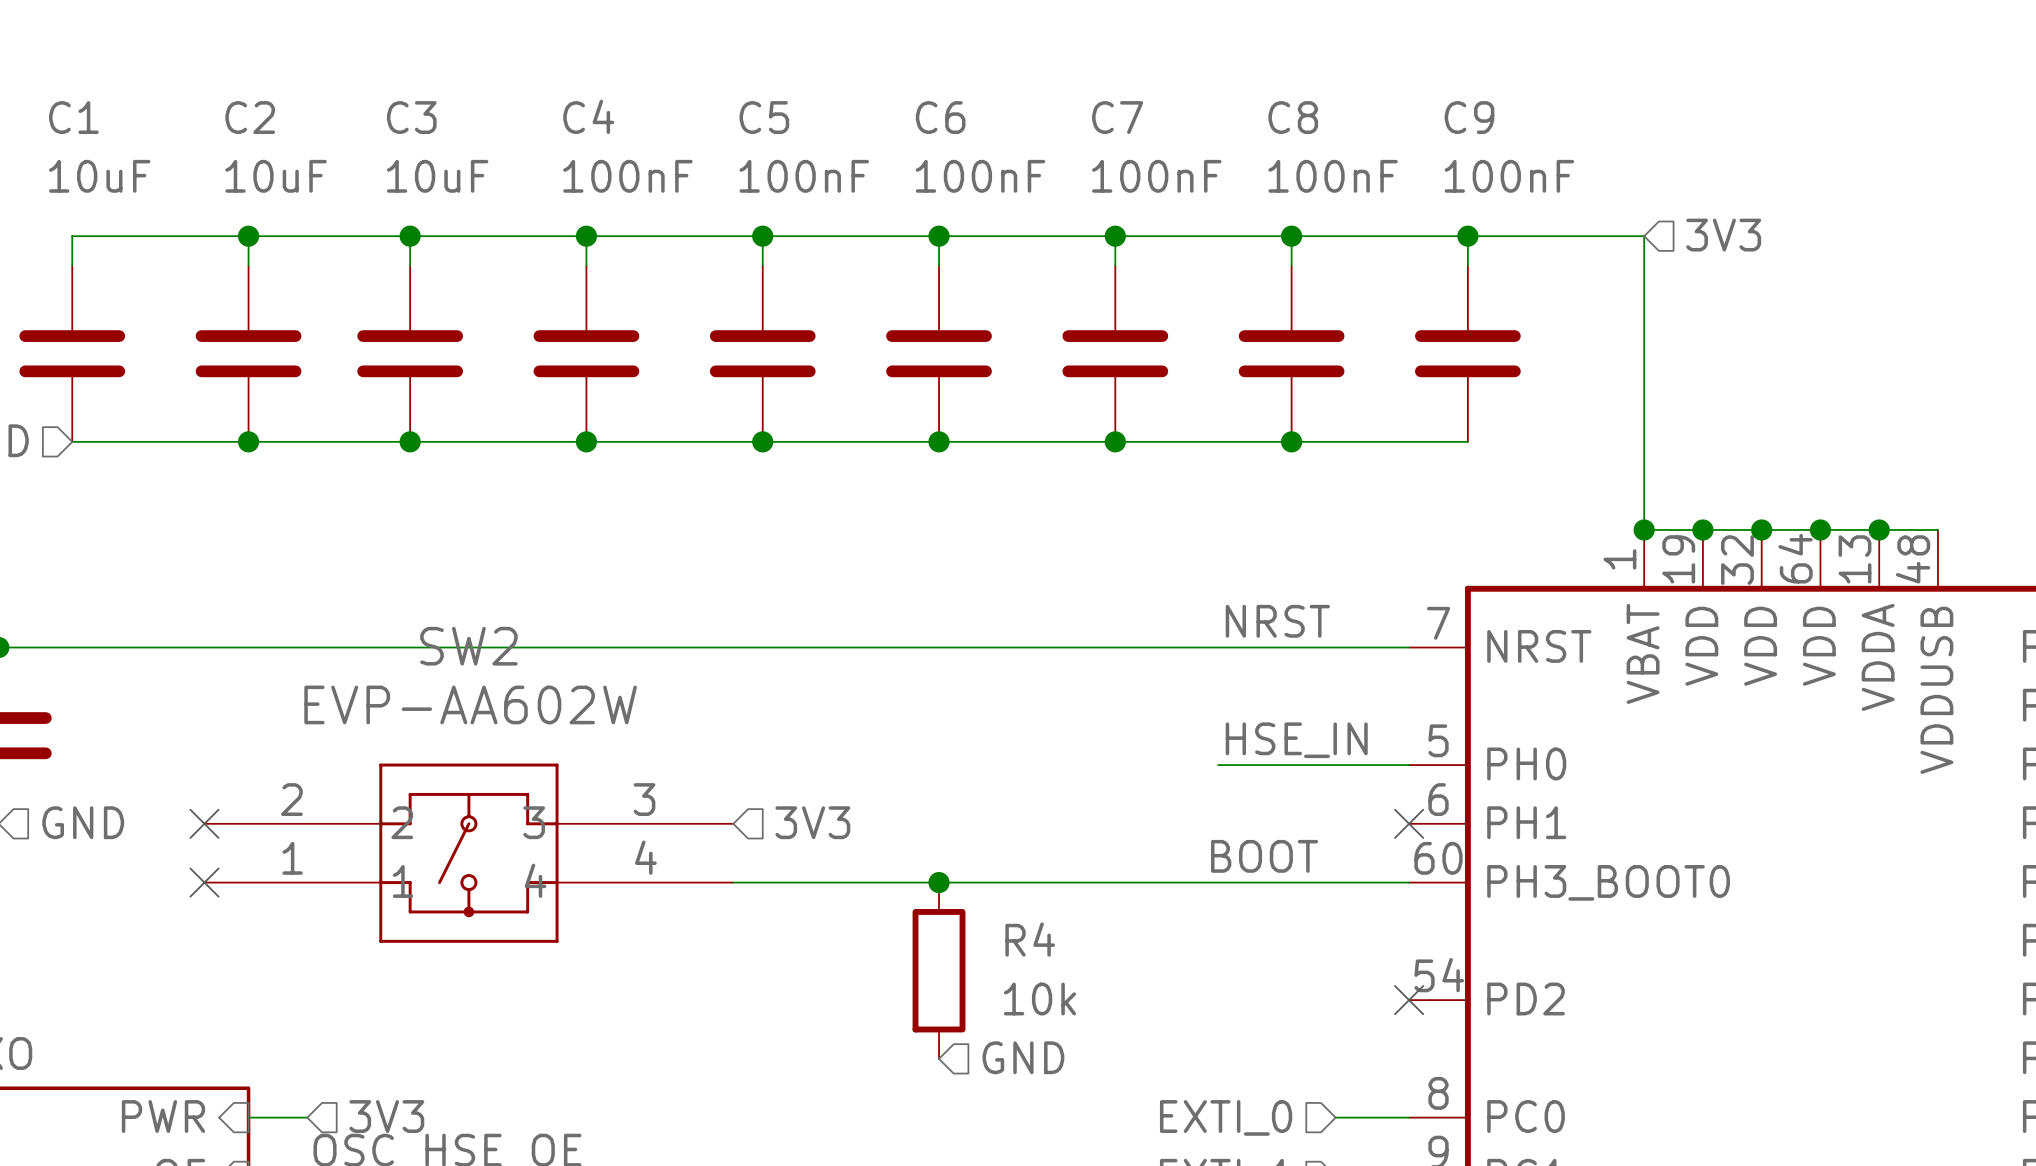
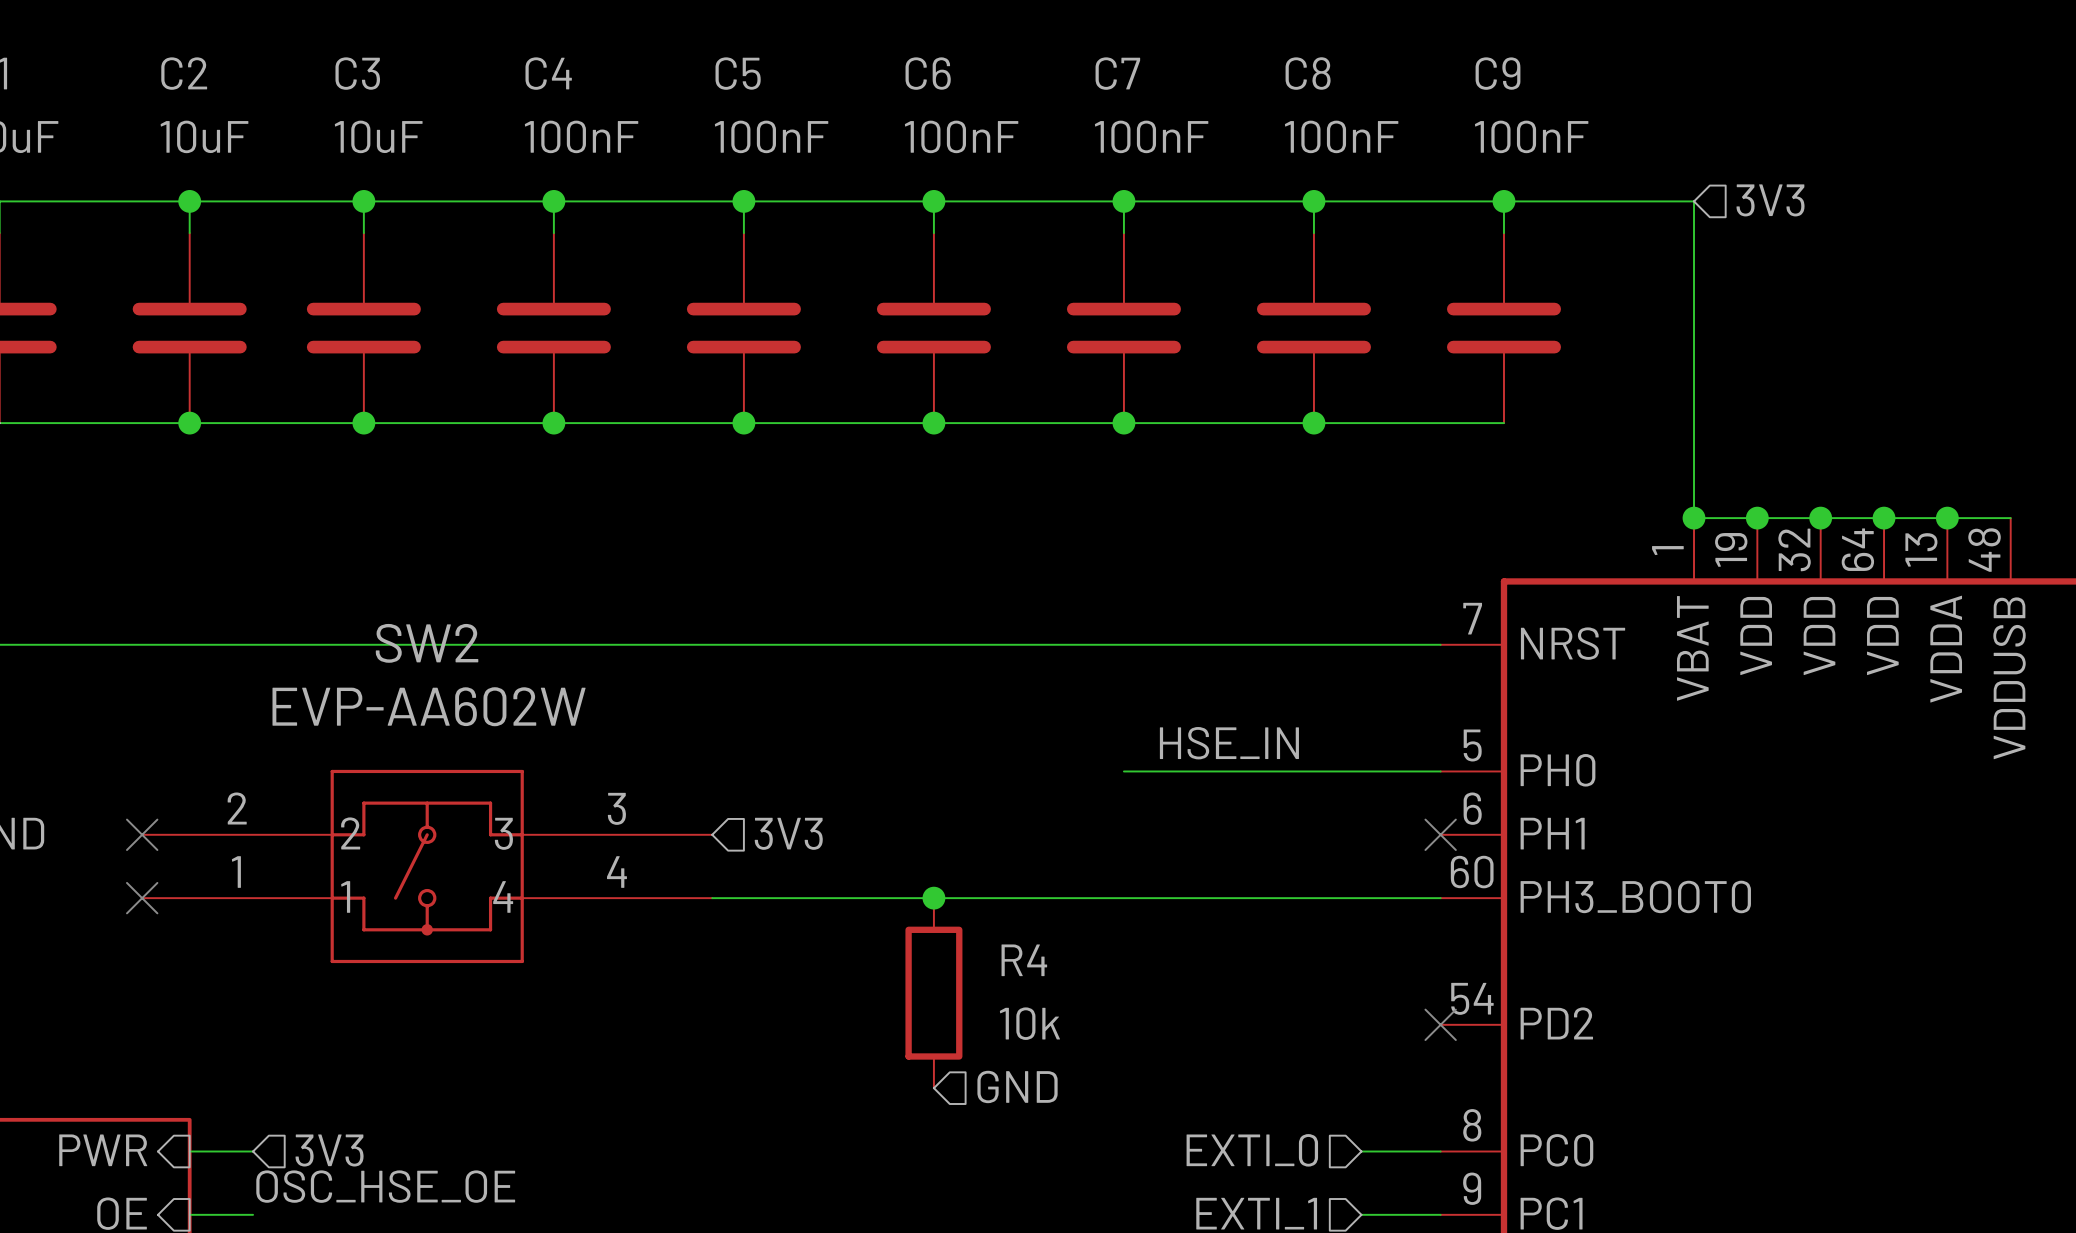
label: NRST (1277, 621) -> none
label position: HSE_IN (1296, 740) -> HSE_IN (1229, 743)
wire: none -> (1123, 771) (1234, 771)
label: BOOT (1264, 856) -> none

